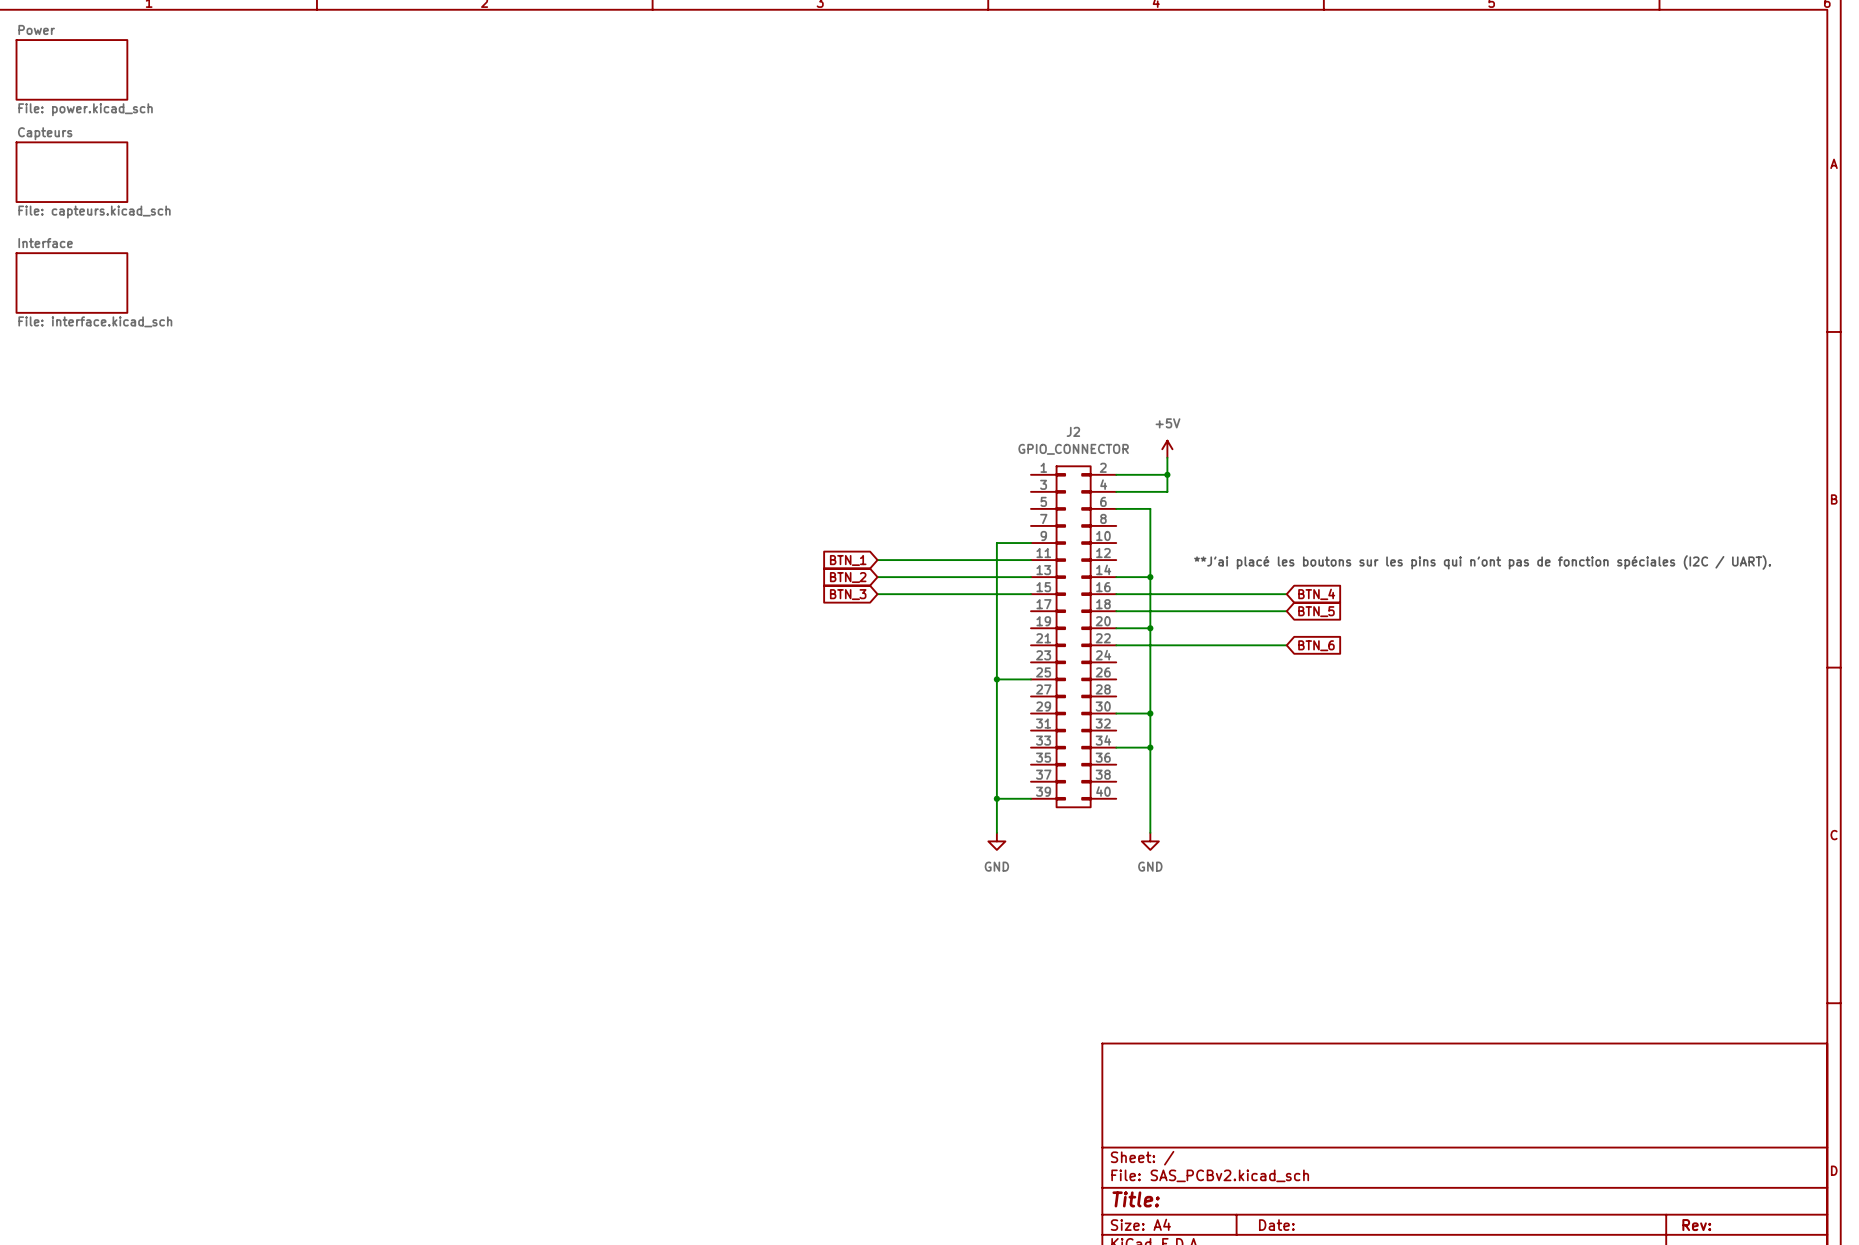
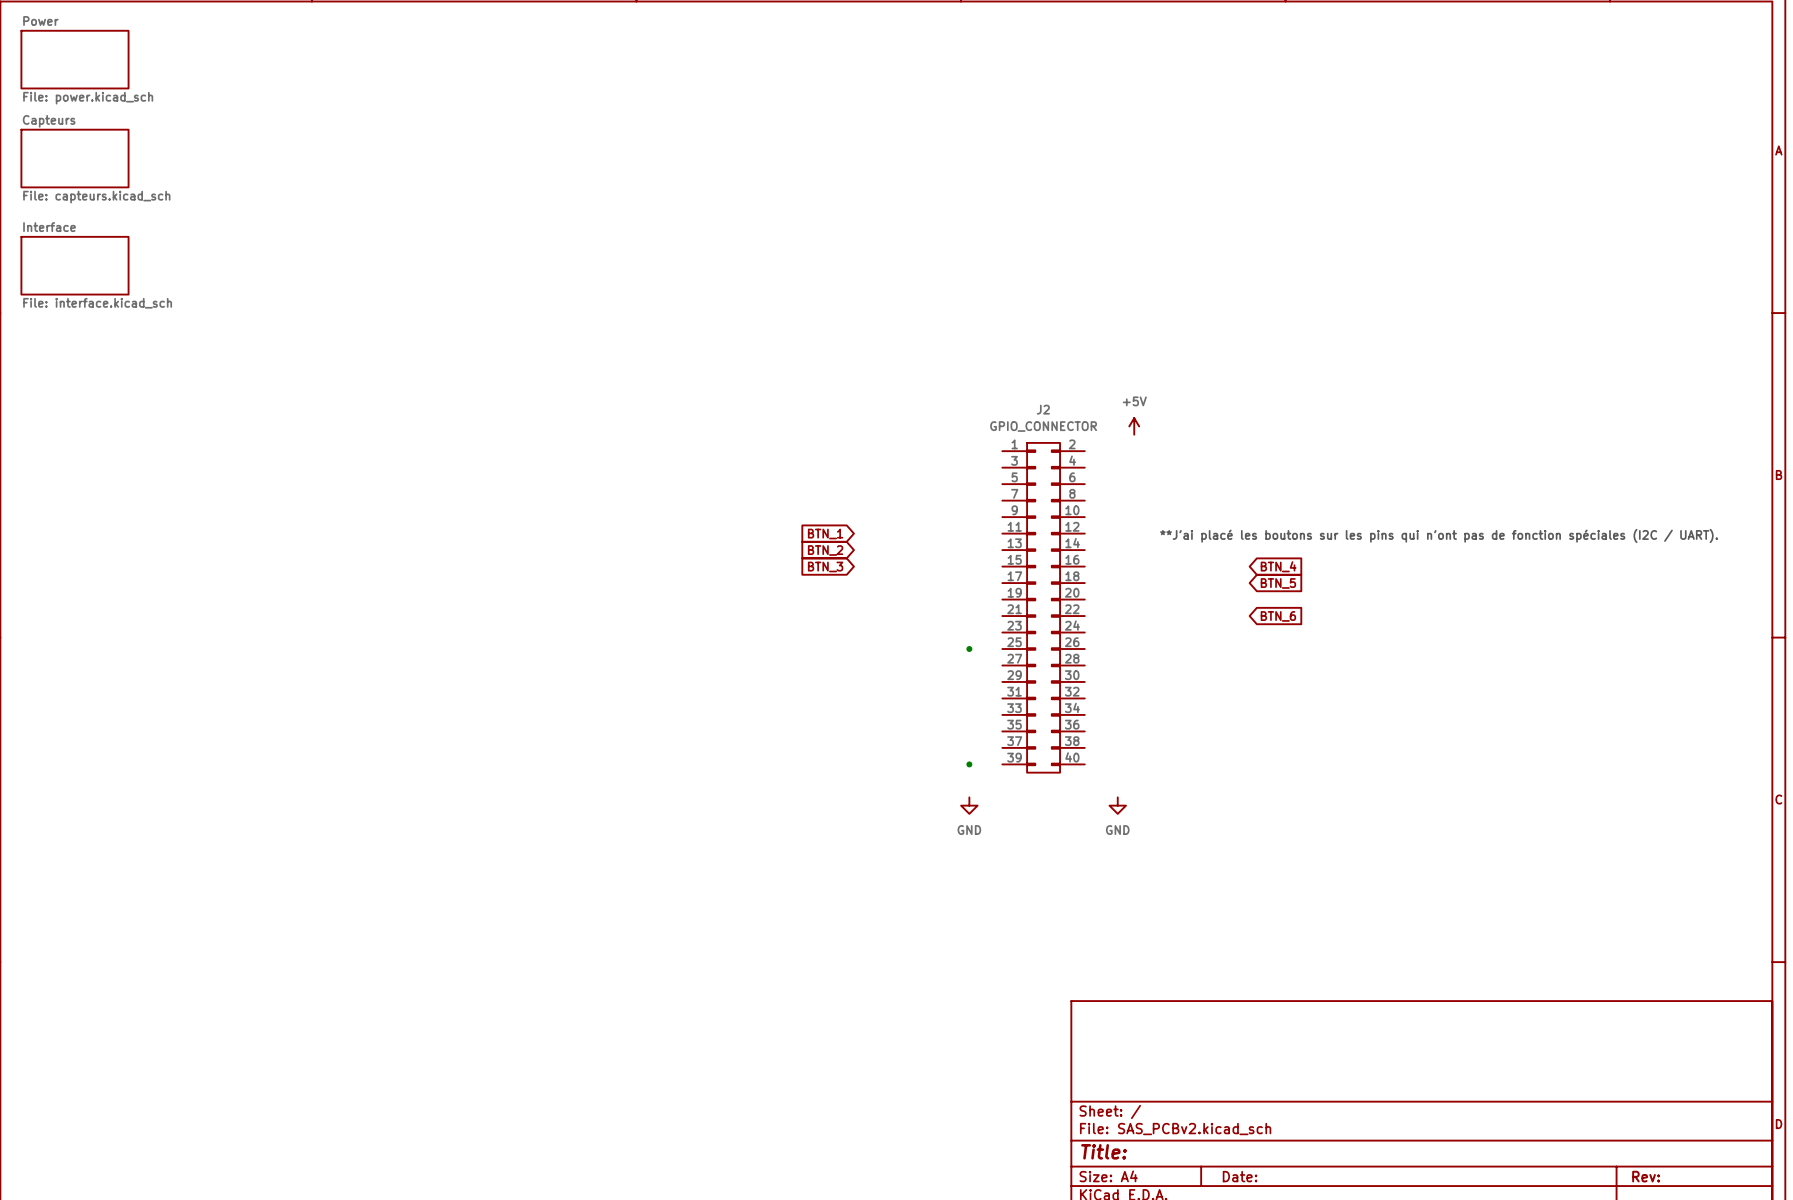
wire: (1167, 457) (1167, 491) (1116, 491) -> none
wire: (1116, 474) (1167, 474) -> none
junction: (1167, 474) -> none
wire: (1116, 508) (1150, 508) (1150, 832) -> none
wire: (1030, 543) (996, 543) (996, 832) -> none
wire: (877, 560) (1030, 560) -> none
wire: (877, 577) (1030, 577) -> none
wire: (1116, 577) (1150, 577) -> none
junction: (1150, 577) -> none
wire: (877, 594) (1030, 594) -> none
wire: (1116, 594) (1286, 594) -> none
wire: (1116, 611) (1286, 611) -> none
wire: (1116, 628) (1150, 628) -> none
junction: (1150, 628) -> none
wire: (1116, 645) (1286, 645) -> none
wire: (996, 679) (1030, 679) -> none
wire: (1116, 713) (1150, 713) -> none
junction: (1150, 713) -> none
wire: (1116, 747) (1150, 747) -> none
junction: (1150, 747) -> none
wire: (996, 798) (1030, 798) -> none

